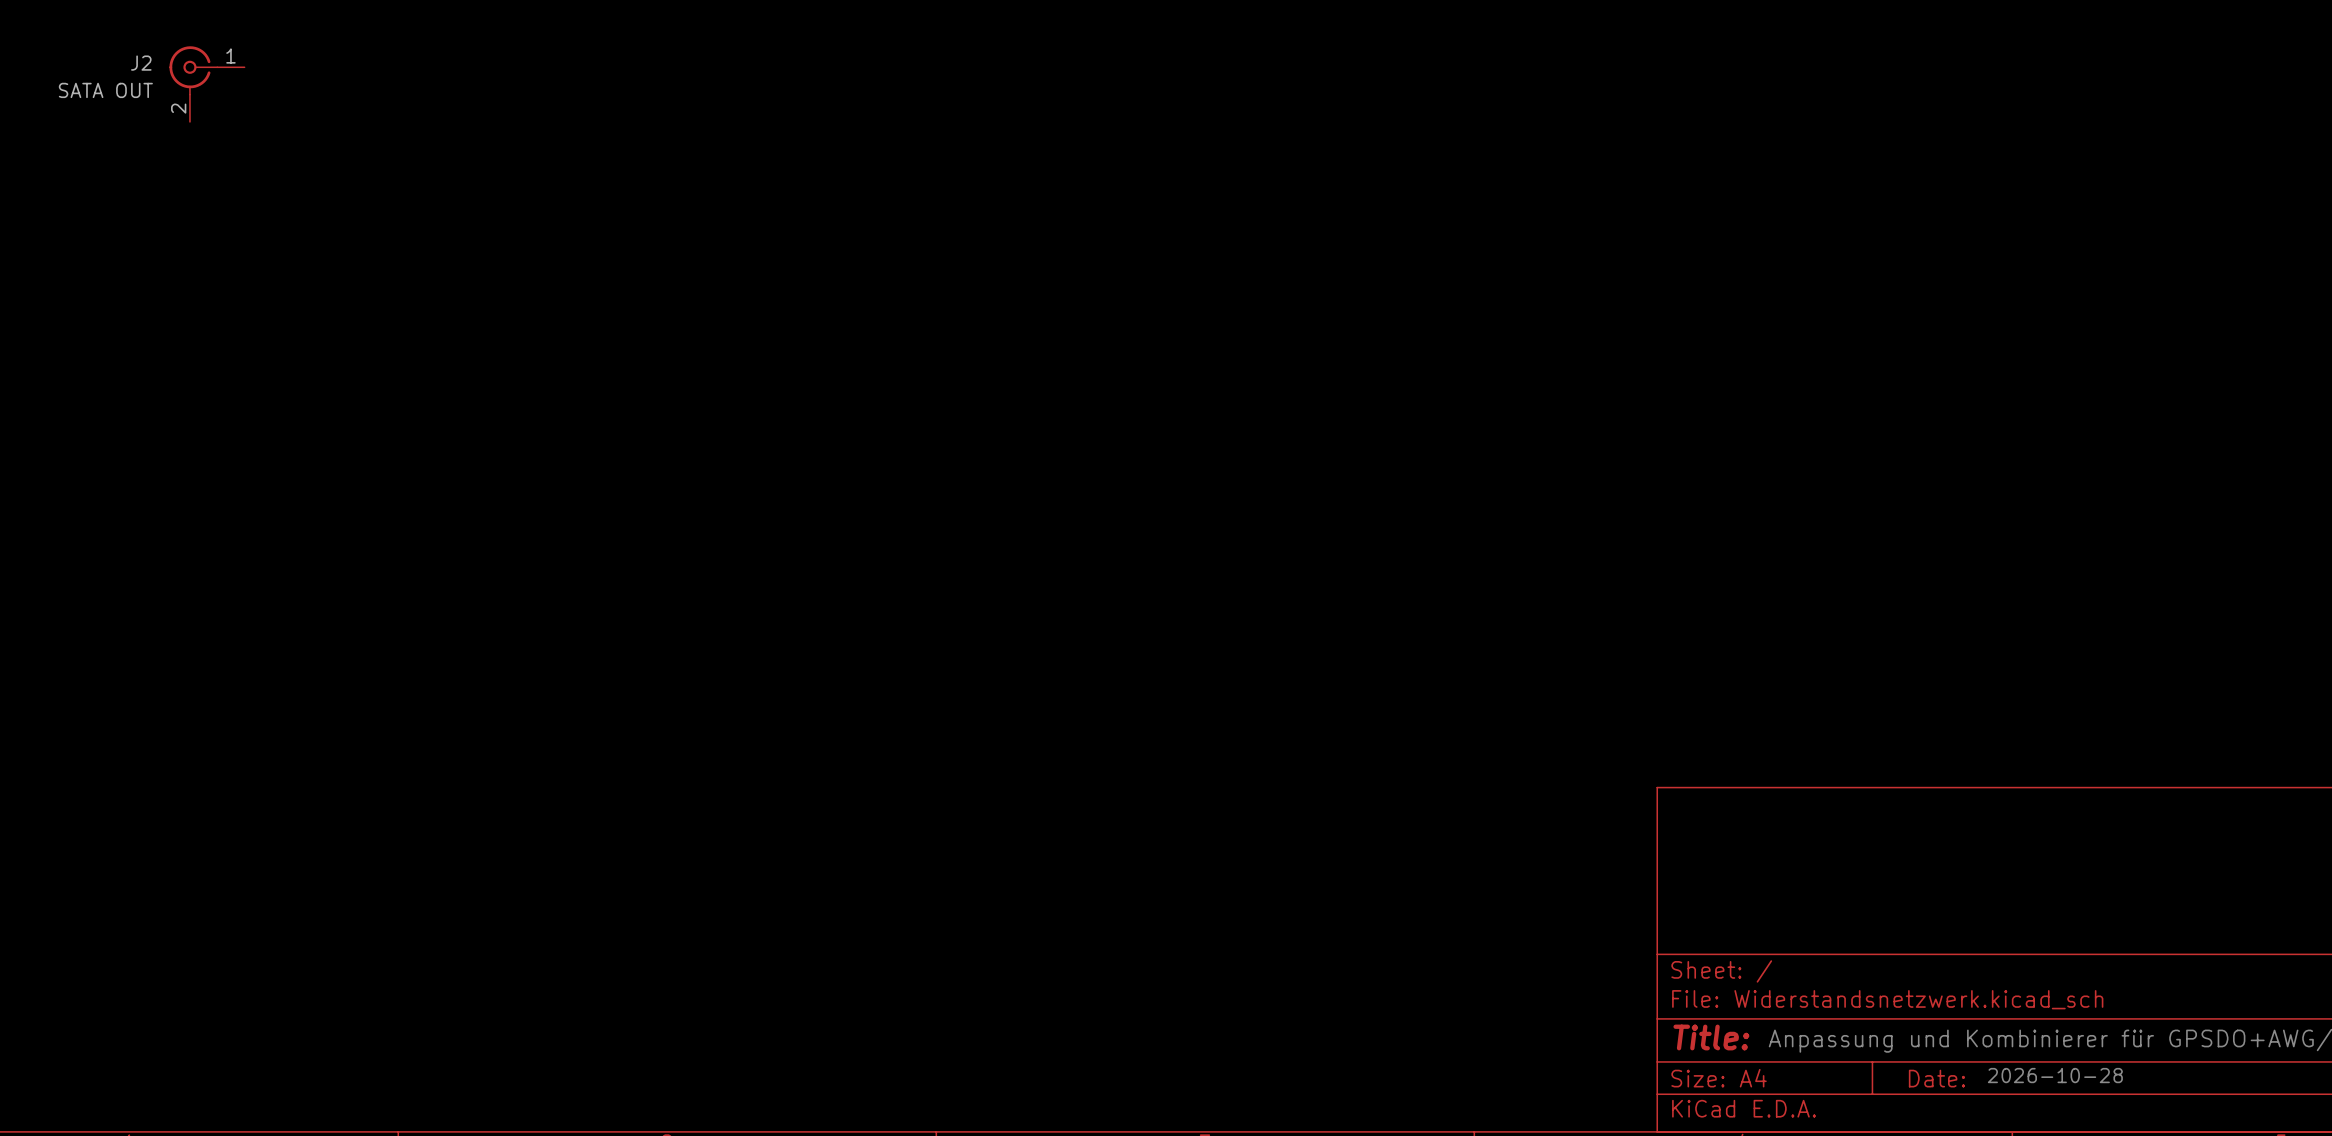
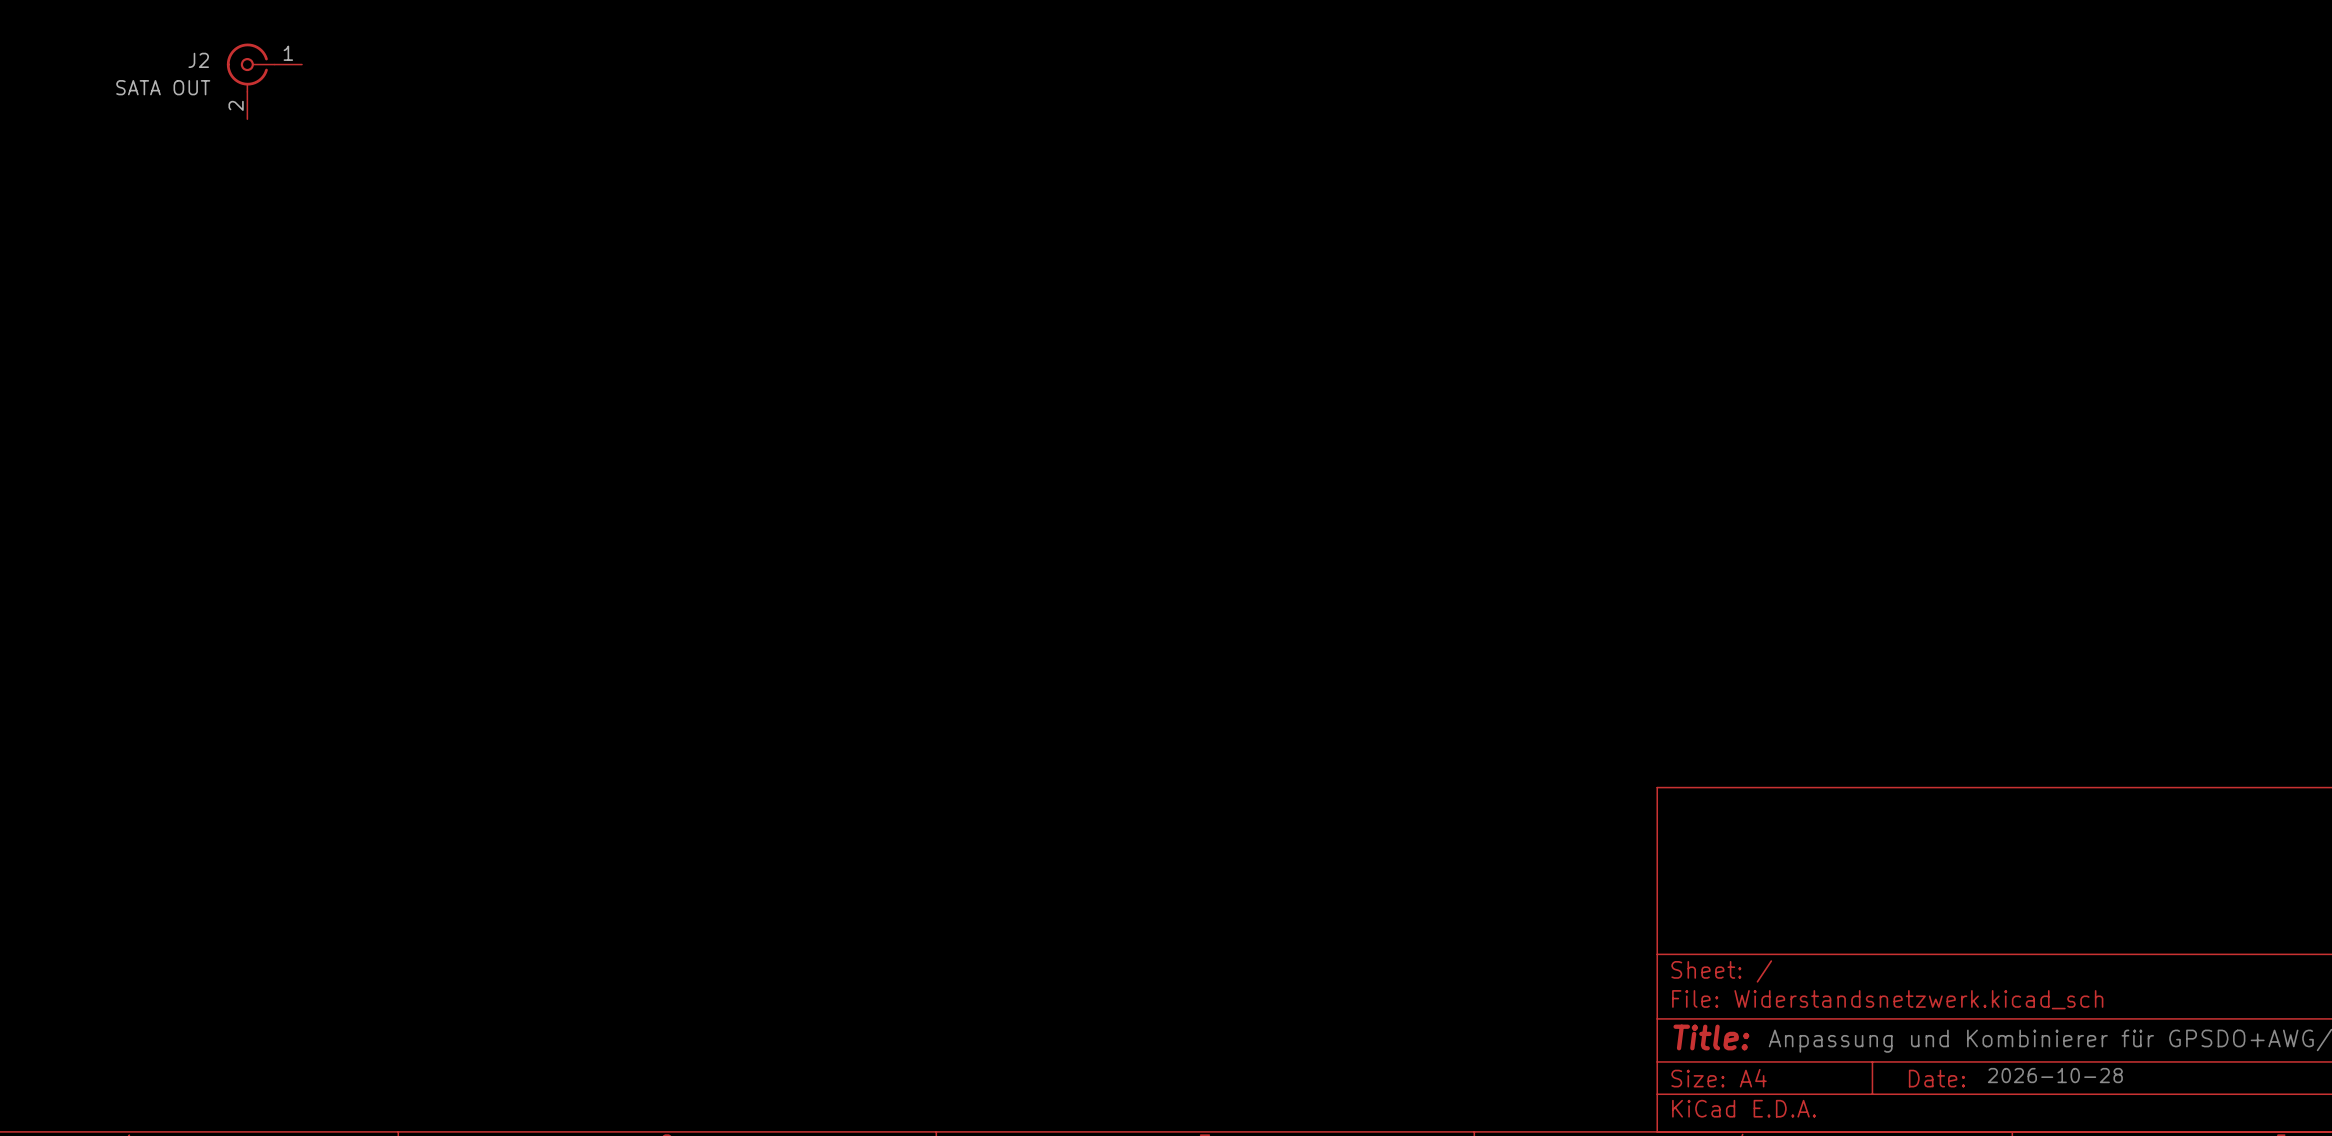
J2 position: (207, 84) -> (264, 81)

